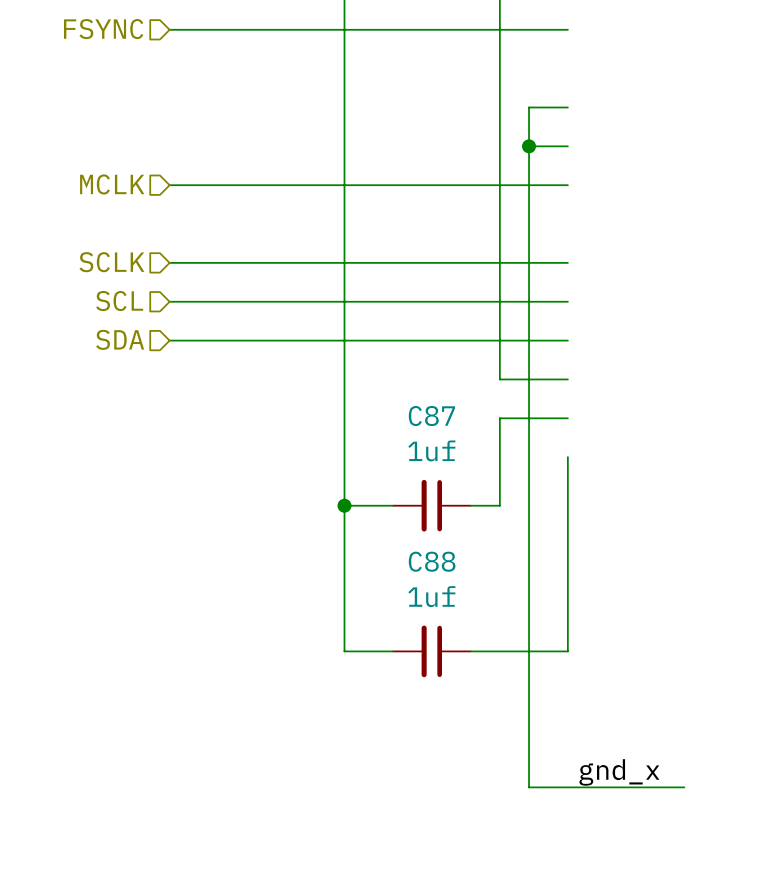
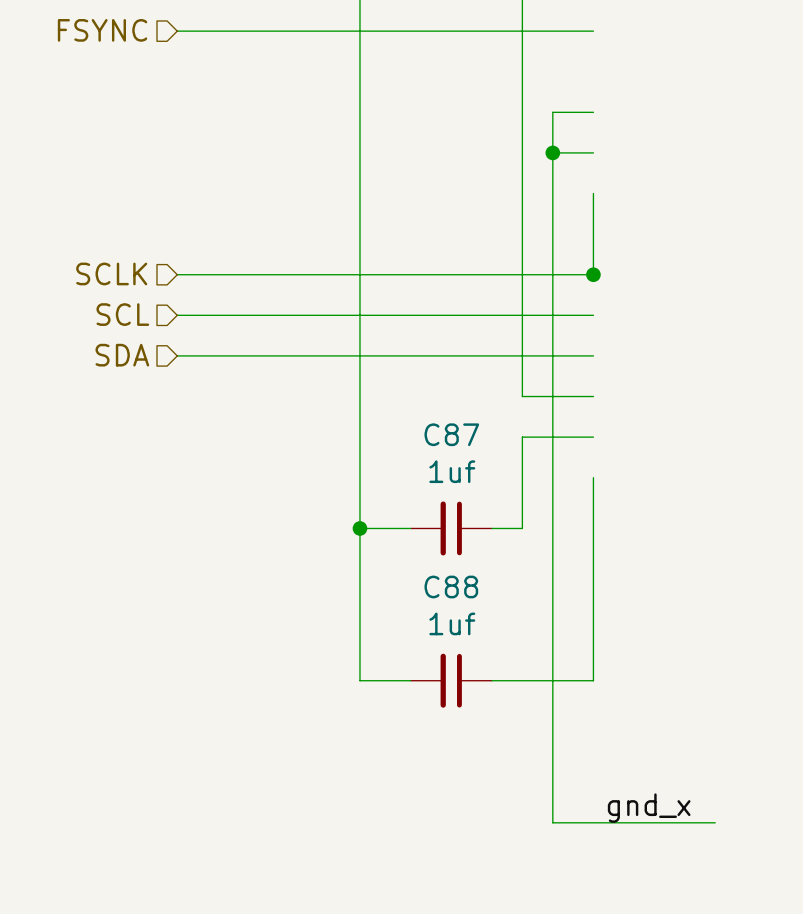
hierarchical label: MCLK (112, 184) -> none
wire: (169, 185) (567, 185) -> (593, 274) (593, 193)
junction: none -> (593, 274)

